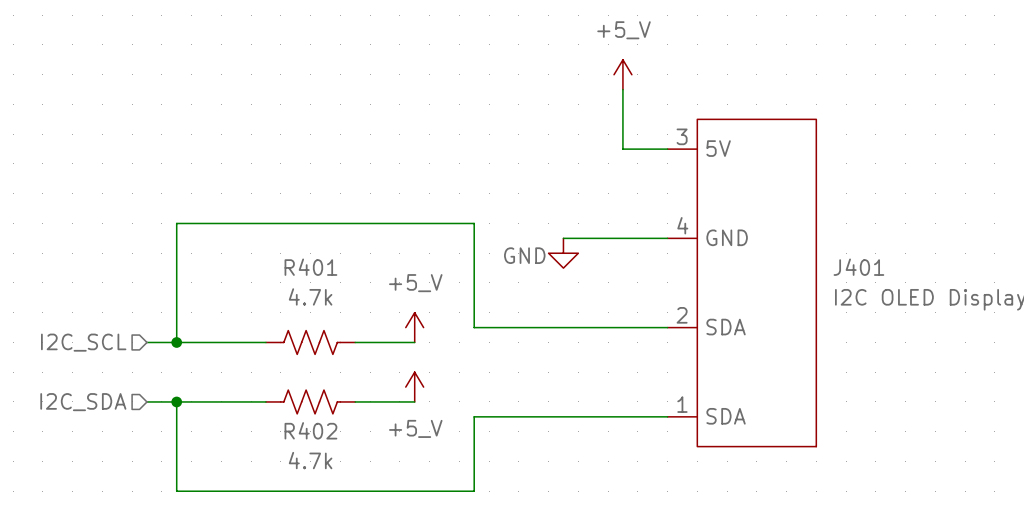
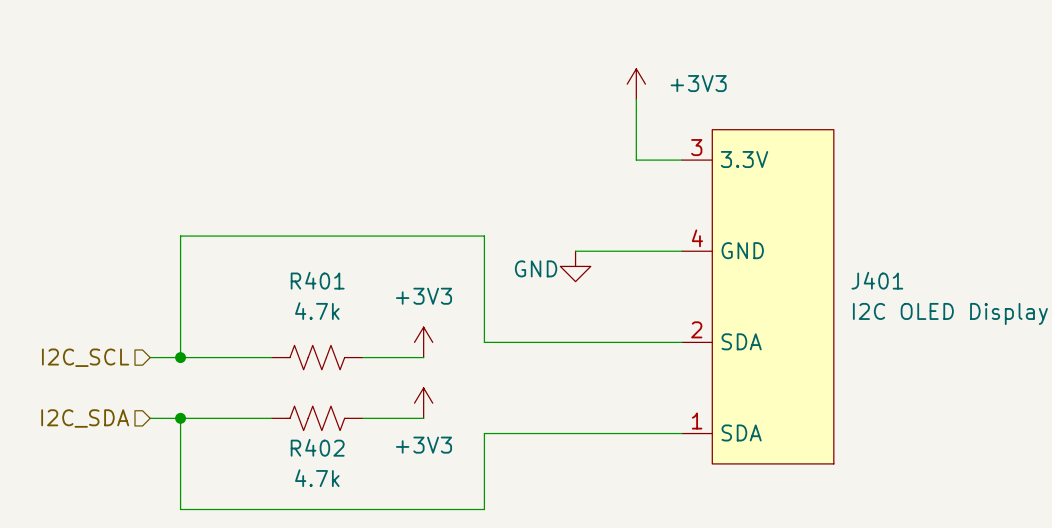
power symbol: +5_V (622, 74) -> +3V3 (636, 84)
J401 pin name: 5V (718, 148) -> 3.3V (744, 159)
power symbol: +5_V (414, 327) -> +3V3 (423, 342)
power symbol: +5_V (414, 387) -> +3V3 (423, 403)

